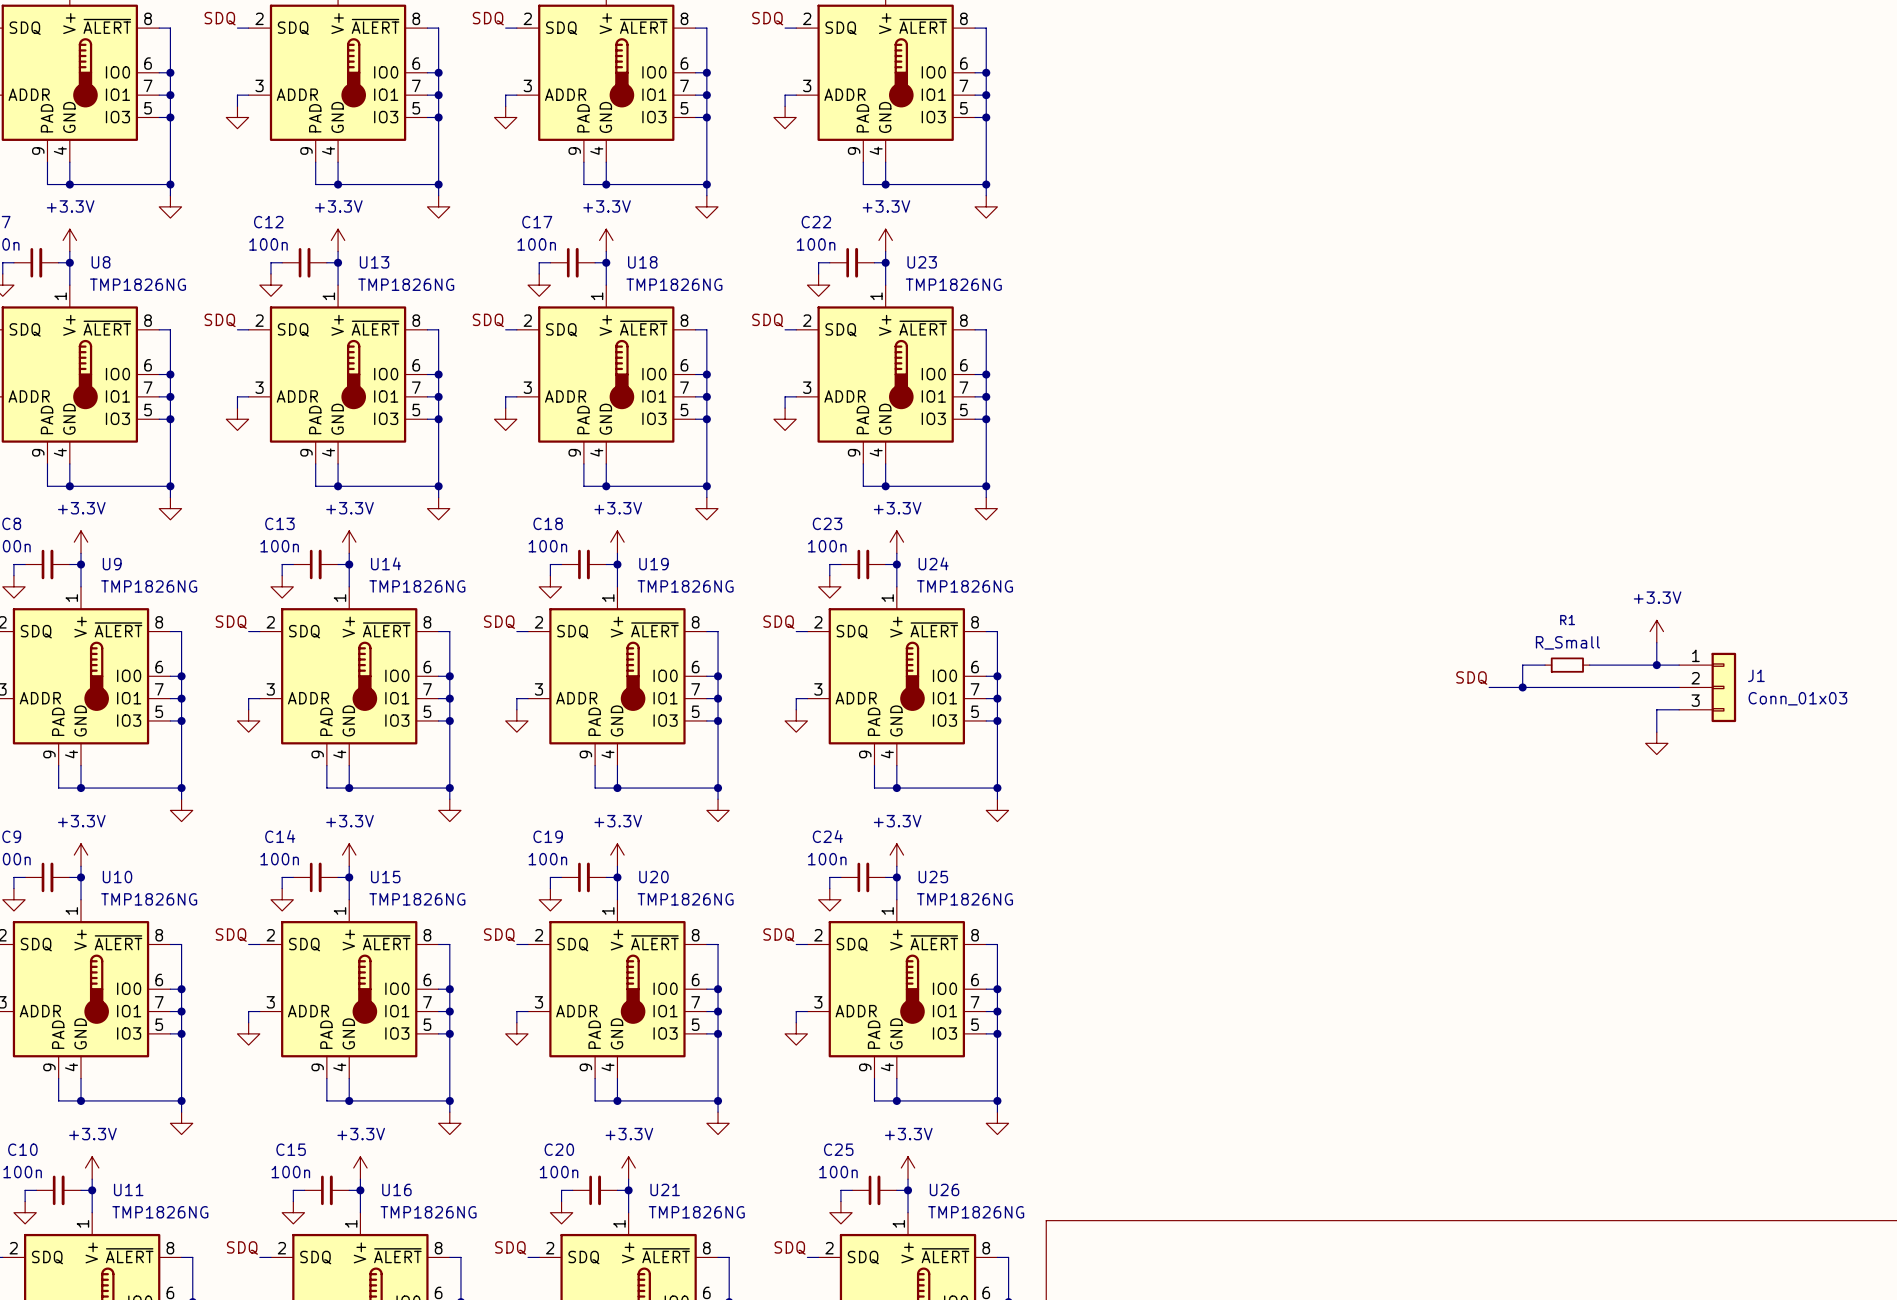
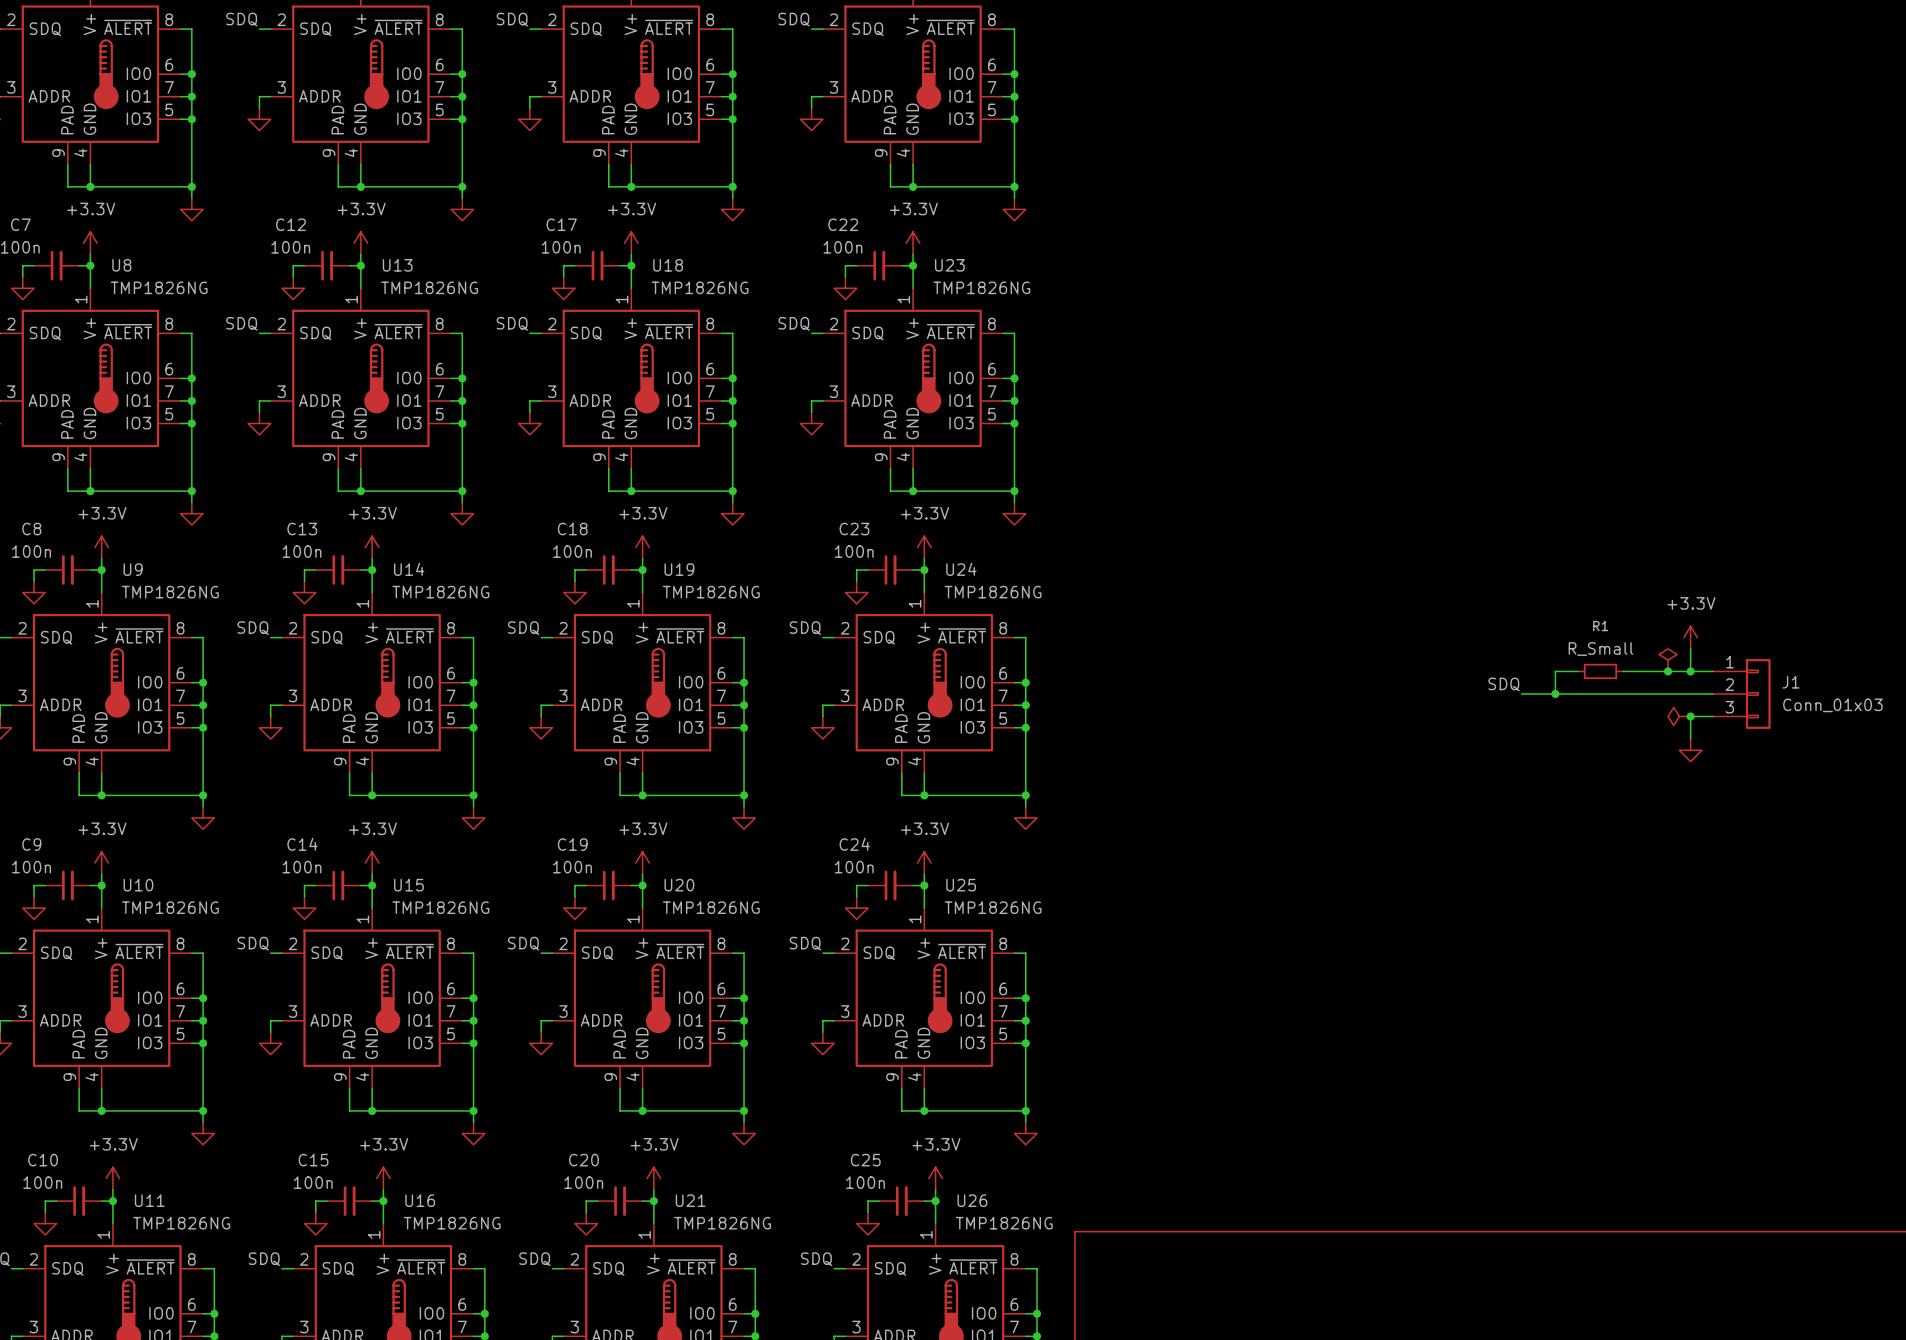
power symbol: none -> (1668, 660)
junction: none -> (1668, 671)
power symbol: none -> (1679, 716)
junction: none -> (1690, 716)

